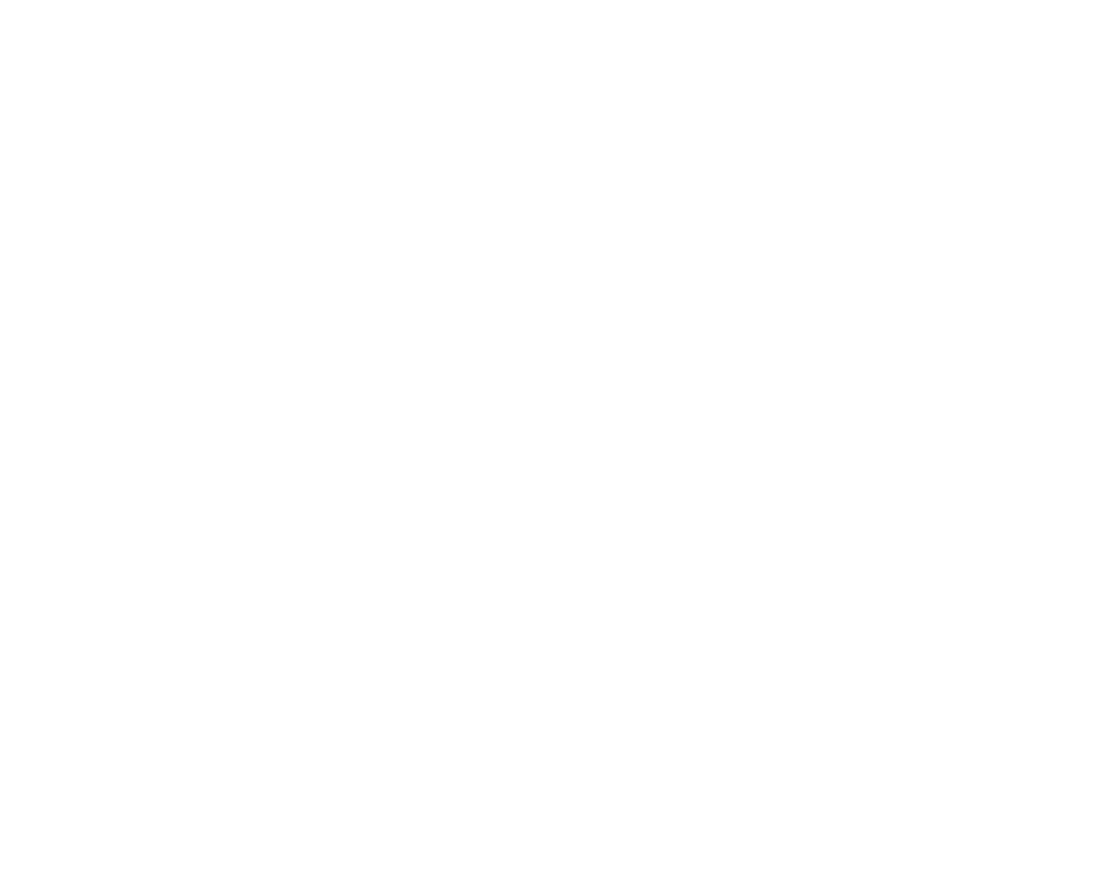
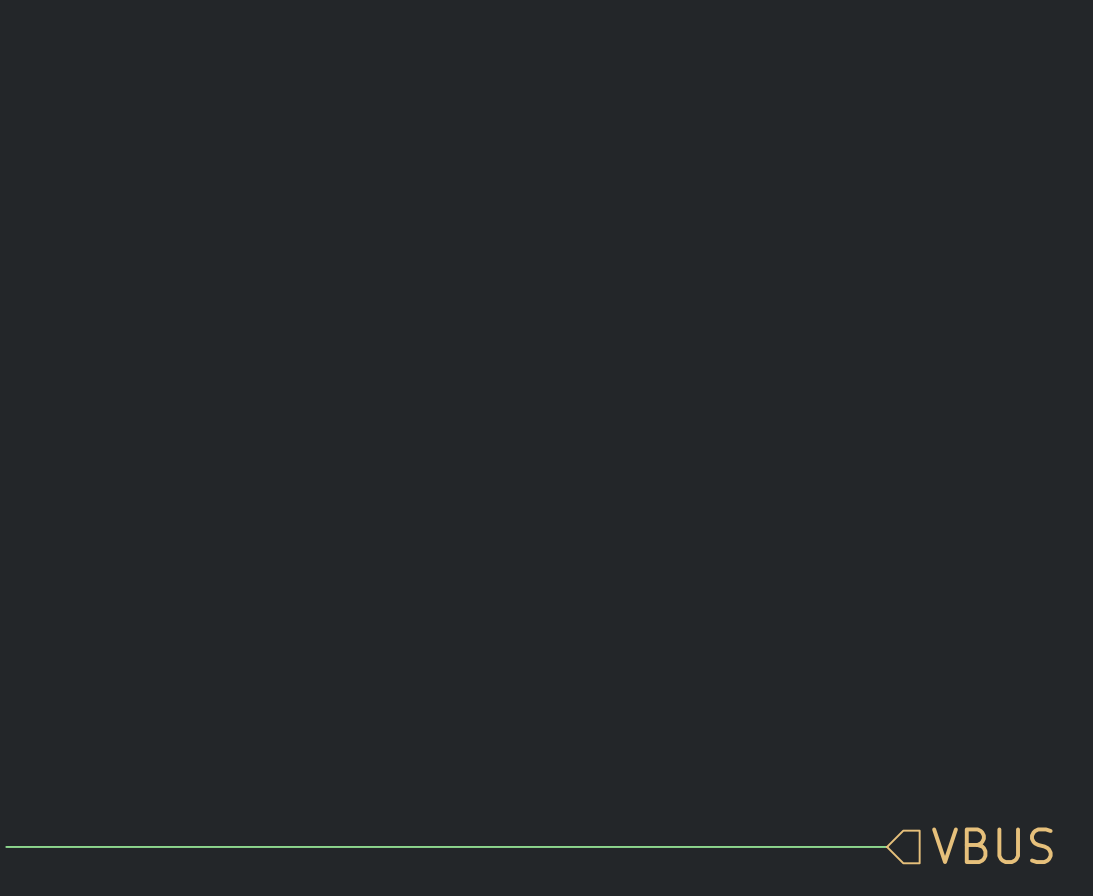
hierarchical label: none -> VBUS (992, 845)
wire: none -> (6, 846) (887, 846)

